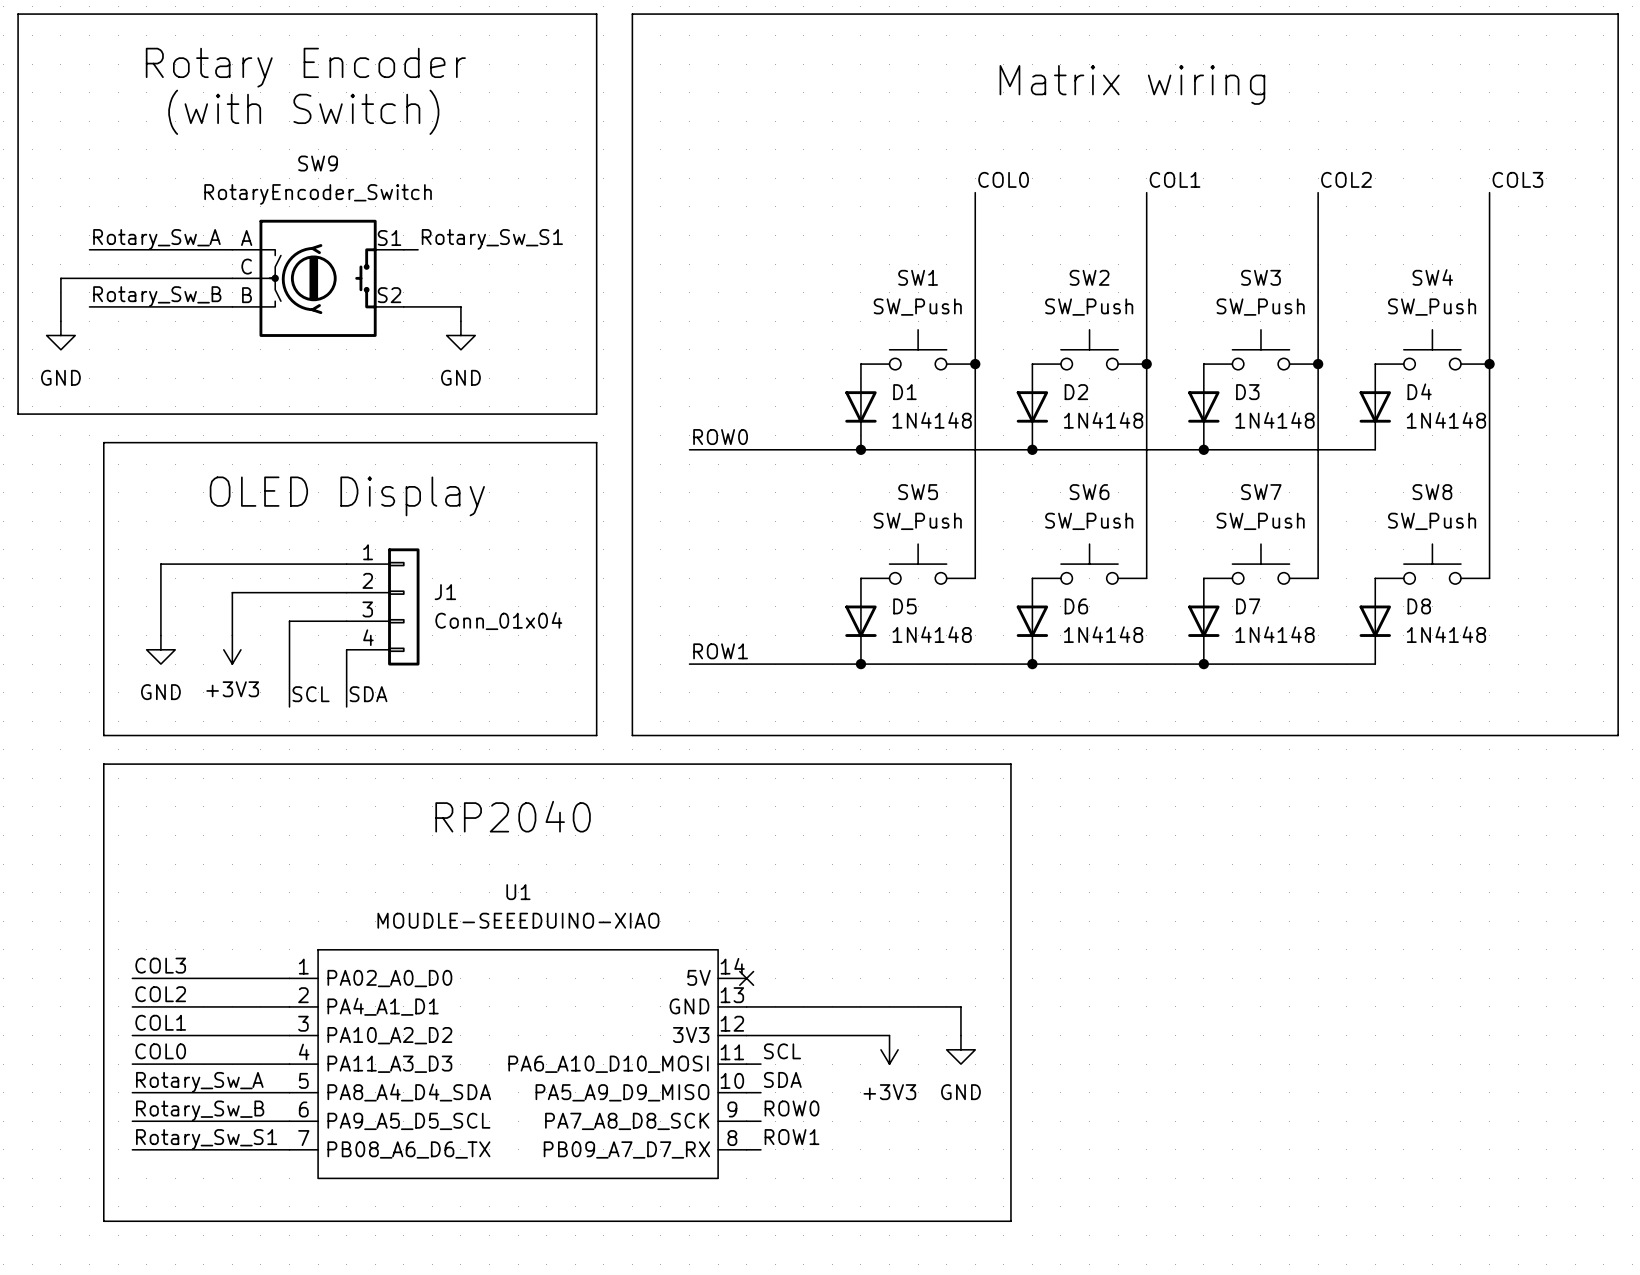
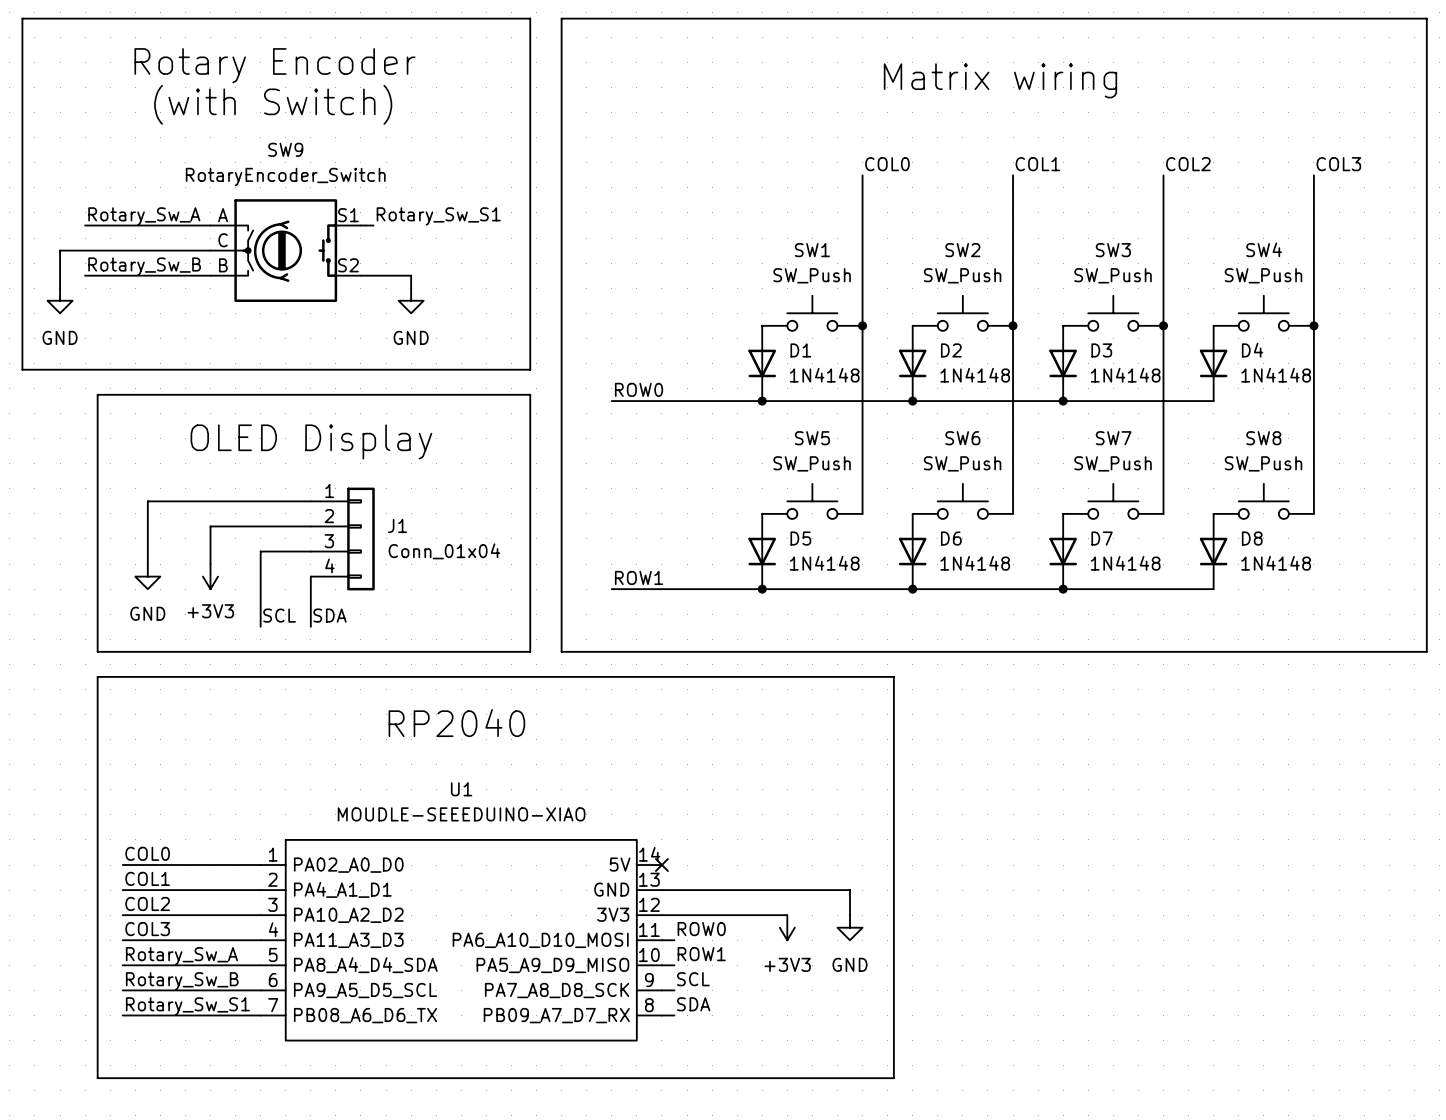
label: COL3 (160, 965) -> COL0 (147, 853)
label: COL2 (160, 994) -> COL1 (147, 878)
label: COL1 (160, 1022) -> COL2 (147, 903)
label: COL0 (160, 1051) -> COL3 (147, 929)
label: SCL (782, 1051) -> ROW0 (701, 929)
label: SDA (782, 1079) -> ROW1 (701, 954)
label: ROW0 (792, 1108) -> SCL (693, 979)
label: ROW1 (792, 1137) -> SDA (693, 1004)

